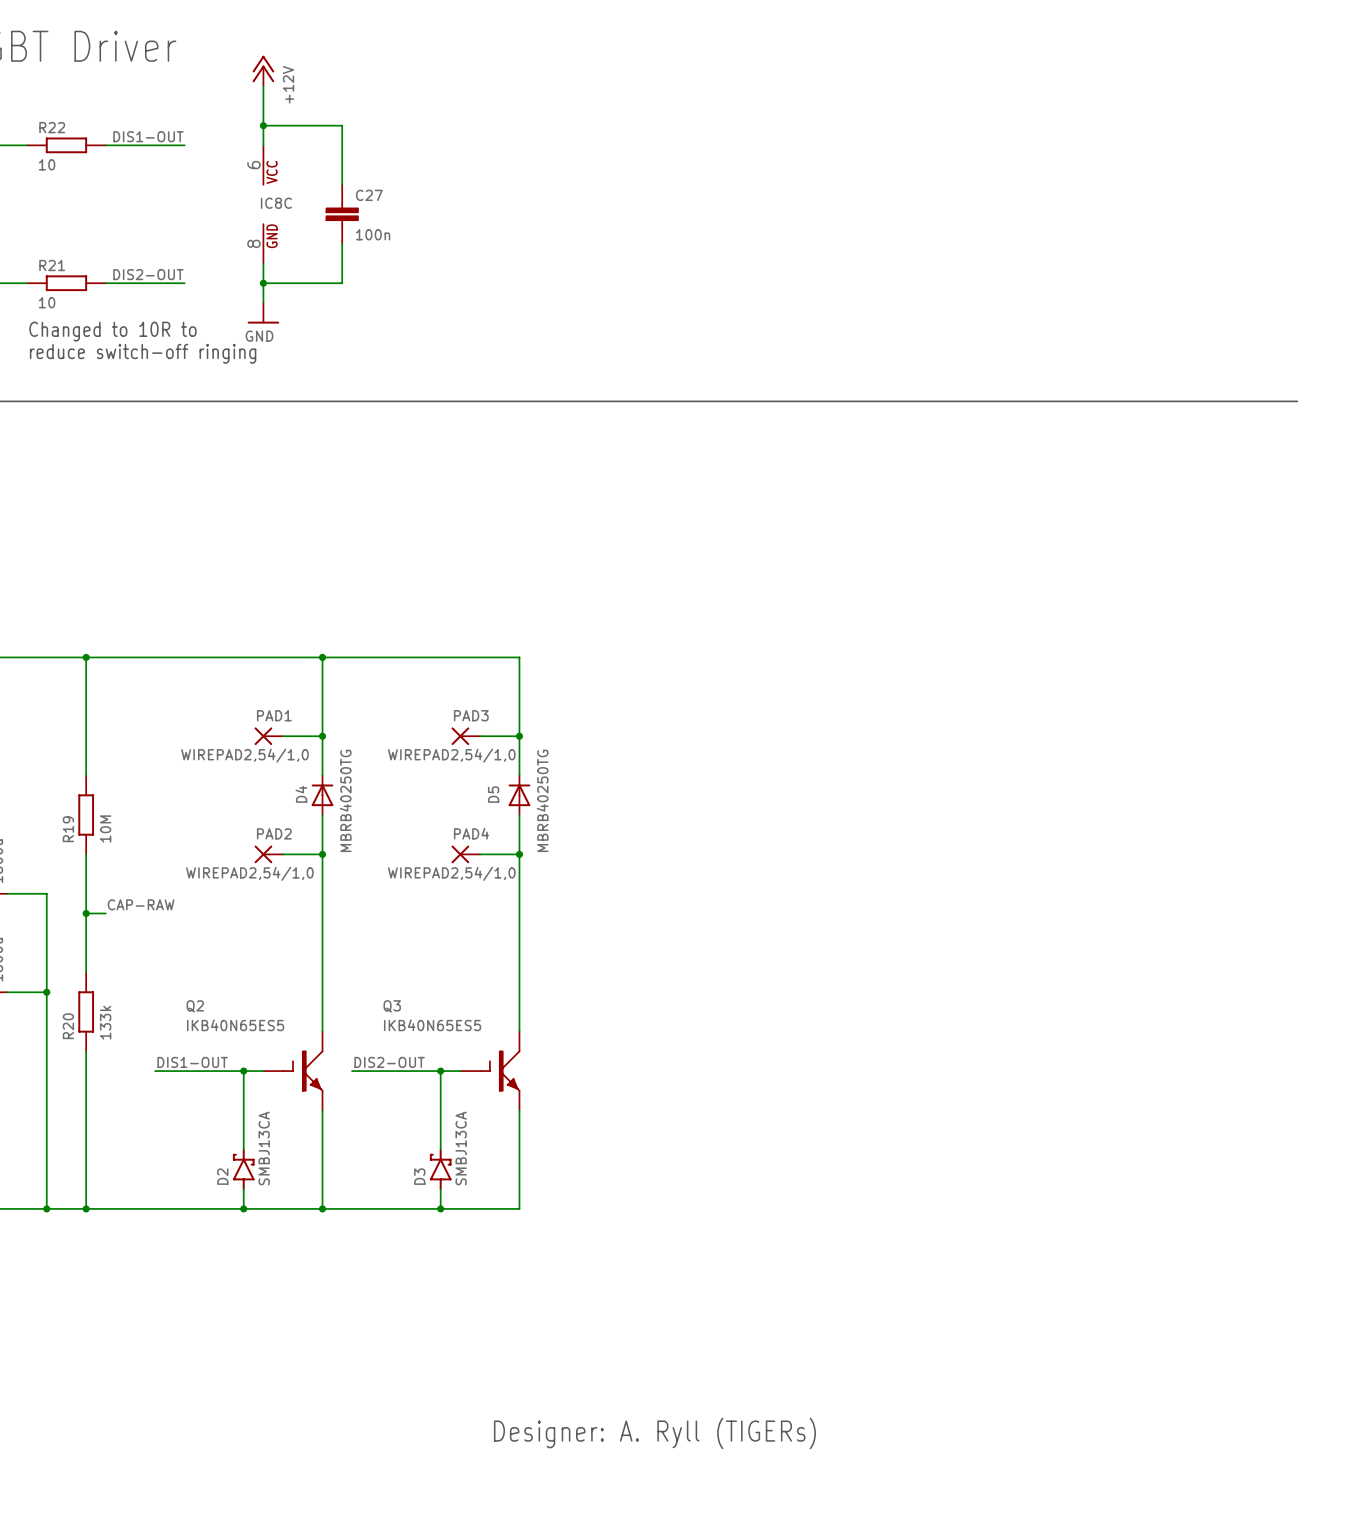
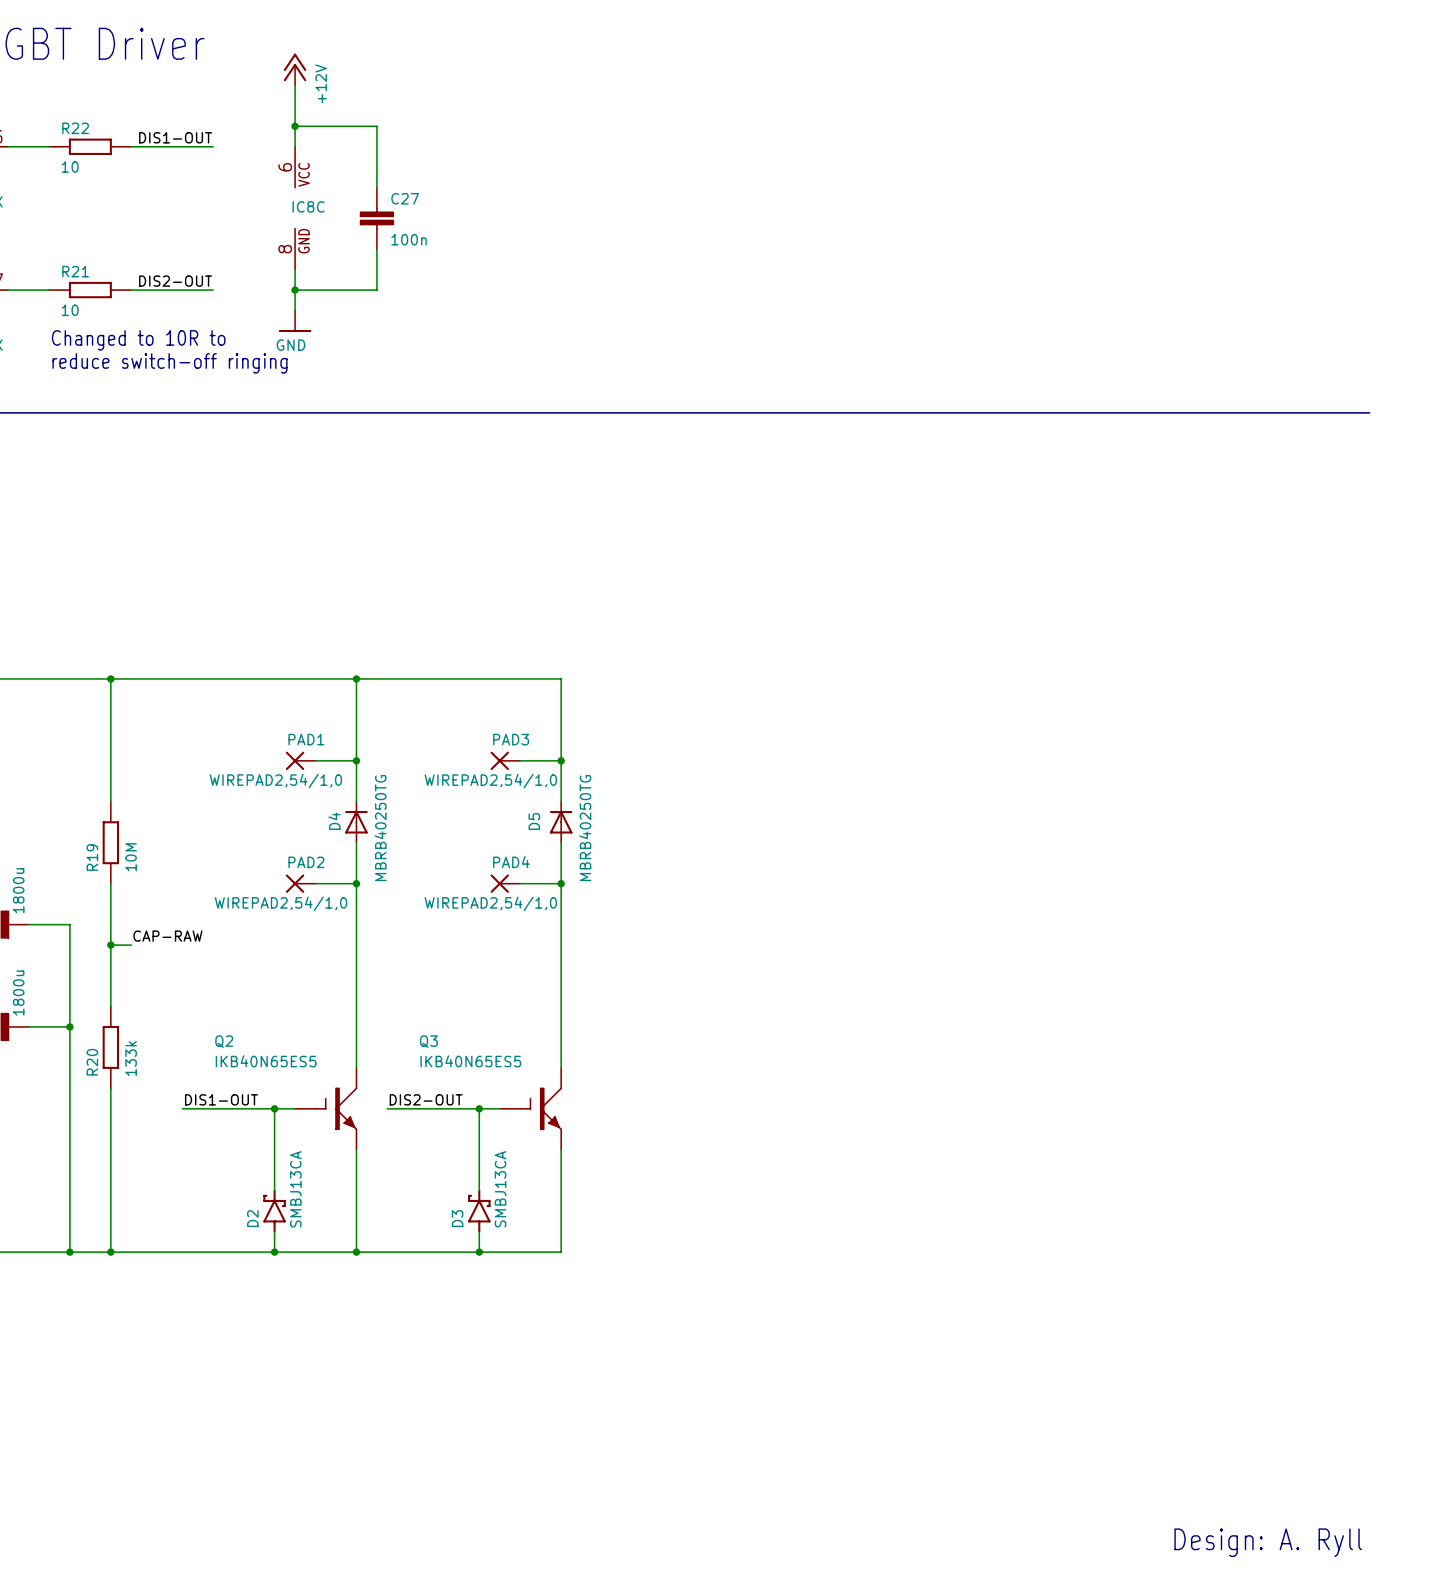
text: Designer: A. Ryll (TIGERs) (654, 1433) -> none
text: none -> Design: A. Ryll (1268, 1542)

